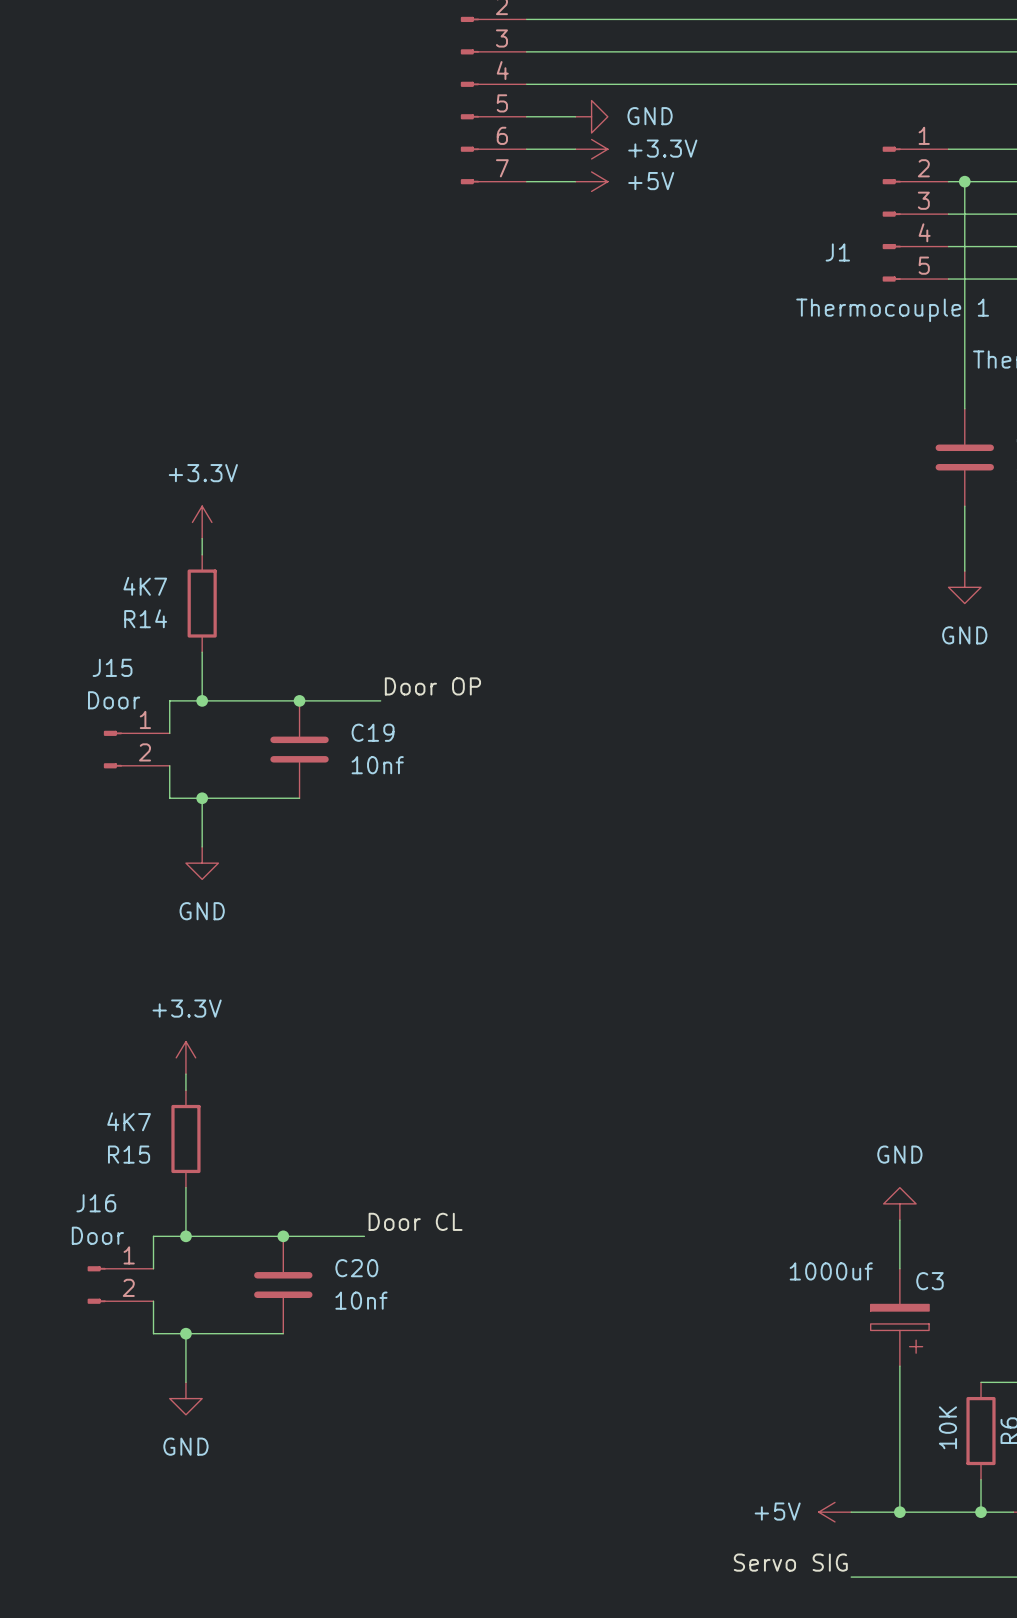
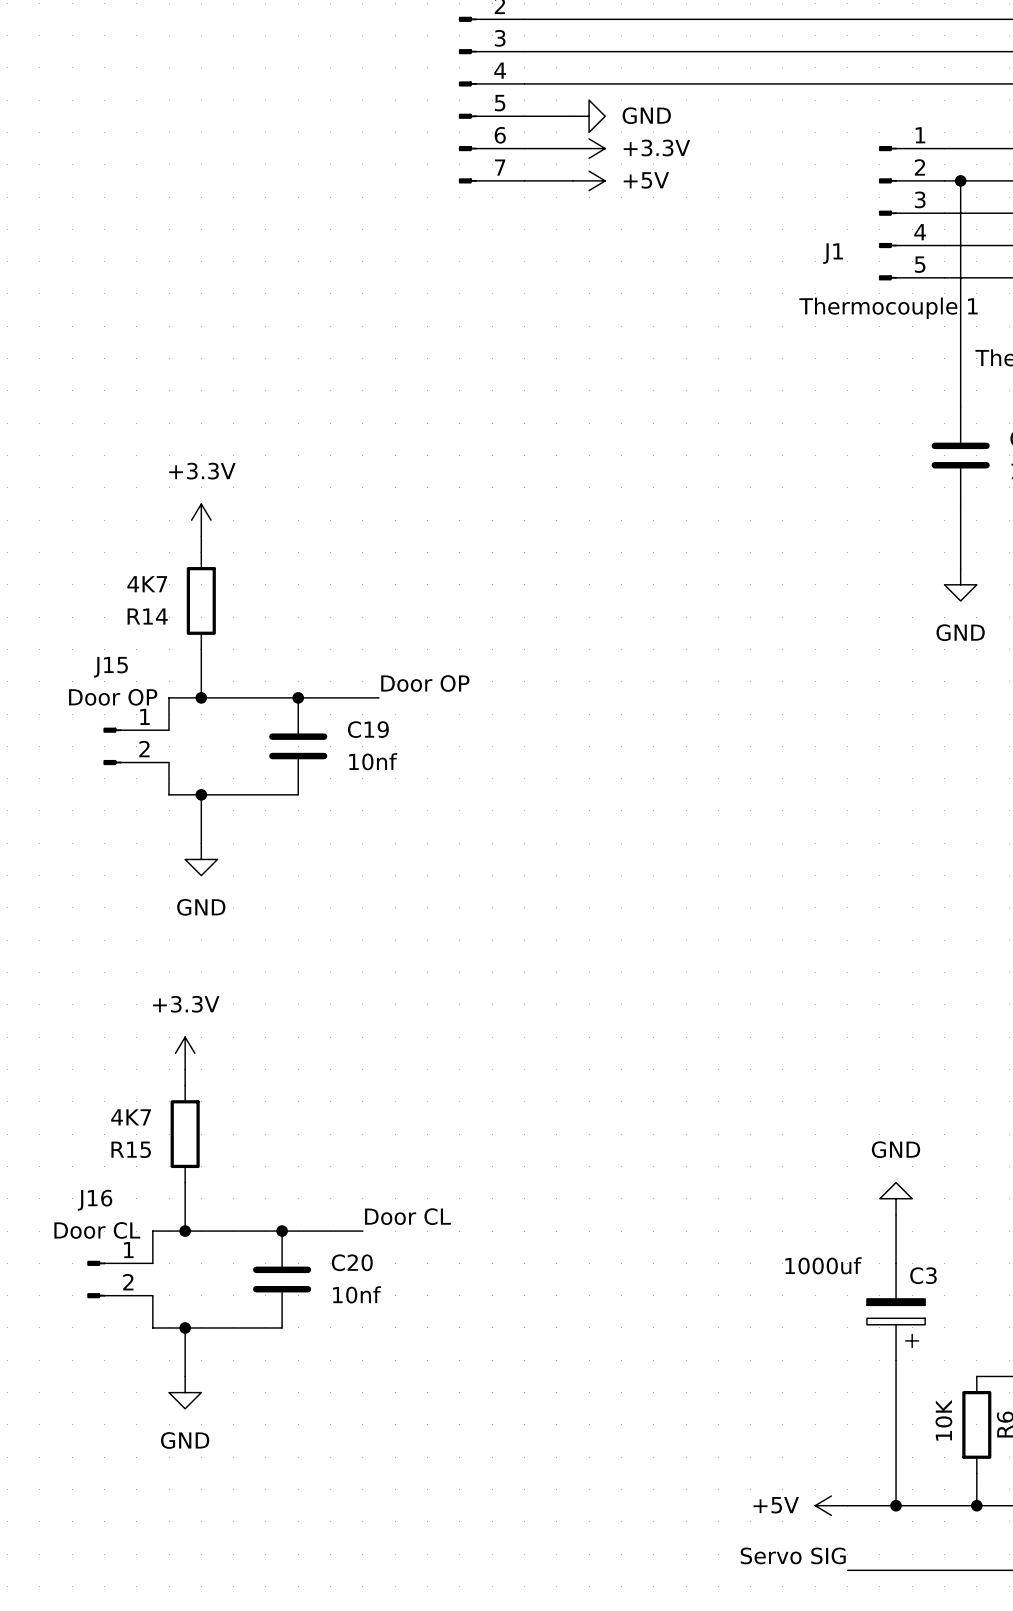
J15 value: Door (114, 700) -> Door OP (113, 697)
J16 value: Door (97, 1235) -> Door CL (97, 1230)

